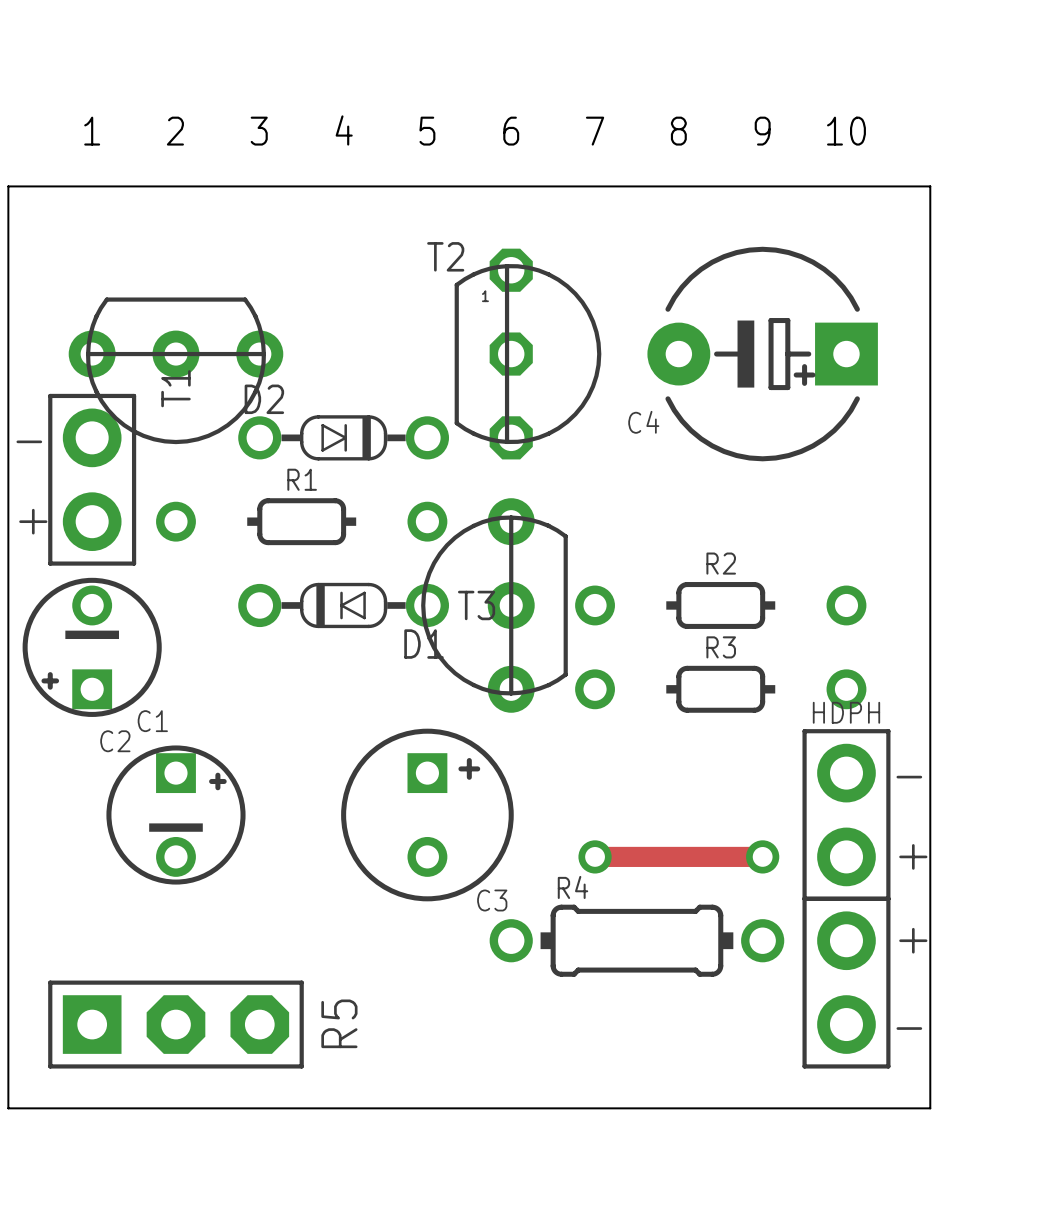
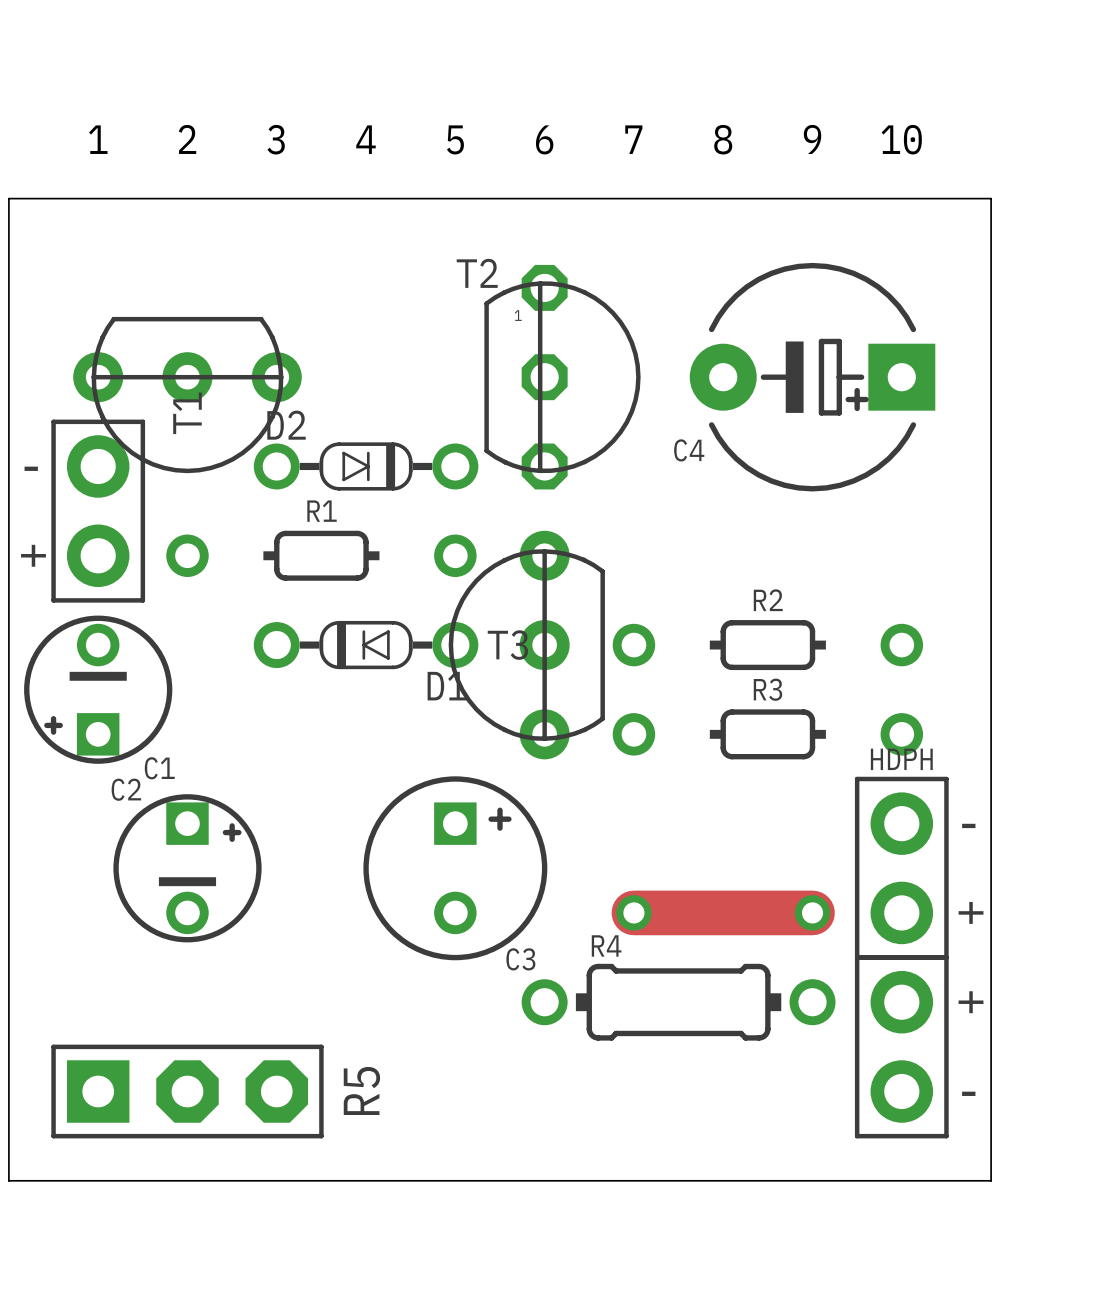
track width: thin (595, 856) (762, 856) -> thick (633, 912) (812, 912)

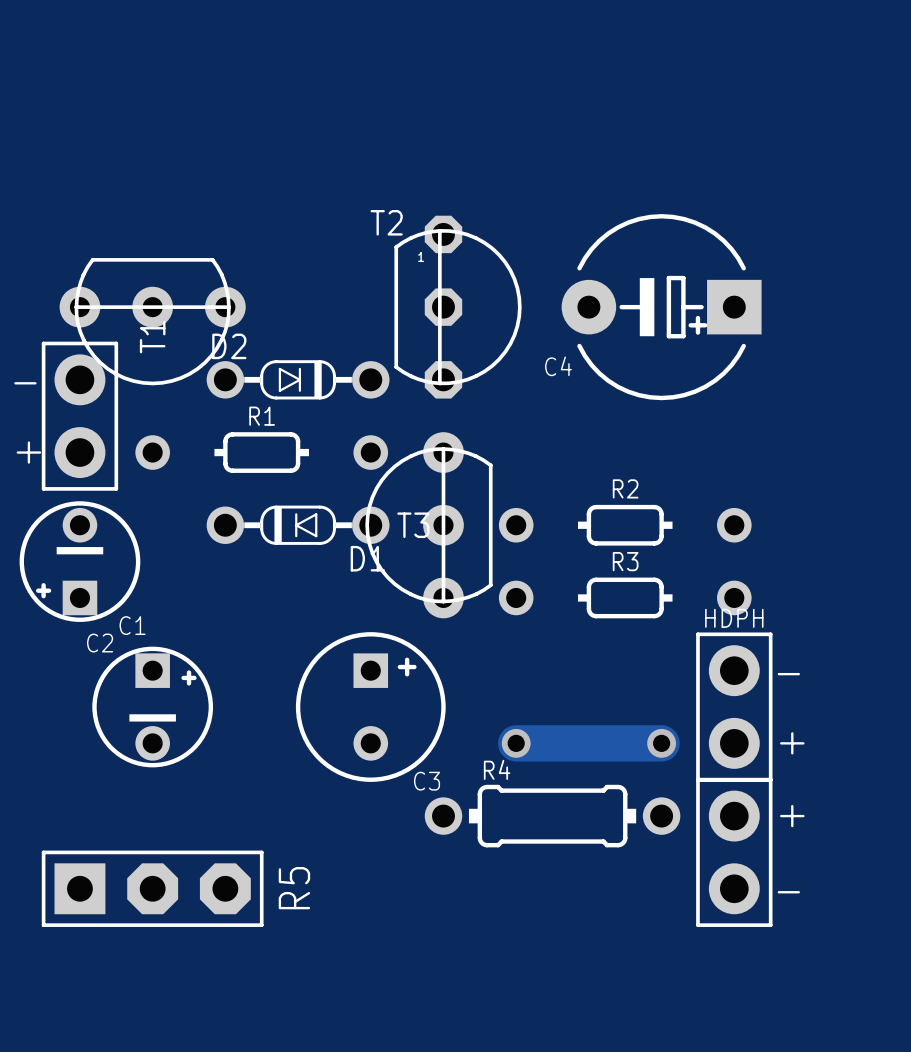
text: 1 (98, 139) -> none
text: 2 (187, 139) -> none
text: 3 (276, 139) -> none
text: 4 (366, 139) -> none
text: 5 (455, 139) -> none
text: 6 (544, 139) -> none
text: 7 (633, 139) -> none
text: 8 (723, 139) -> none
text: 9 (812, 139) -> none
text: 10 (901, 139) -> none
board edge: (8, 198) (991, 198) (991, 1180) (8, 1180) (8, 198) -> none

